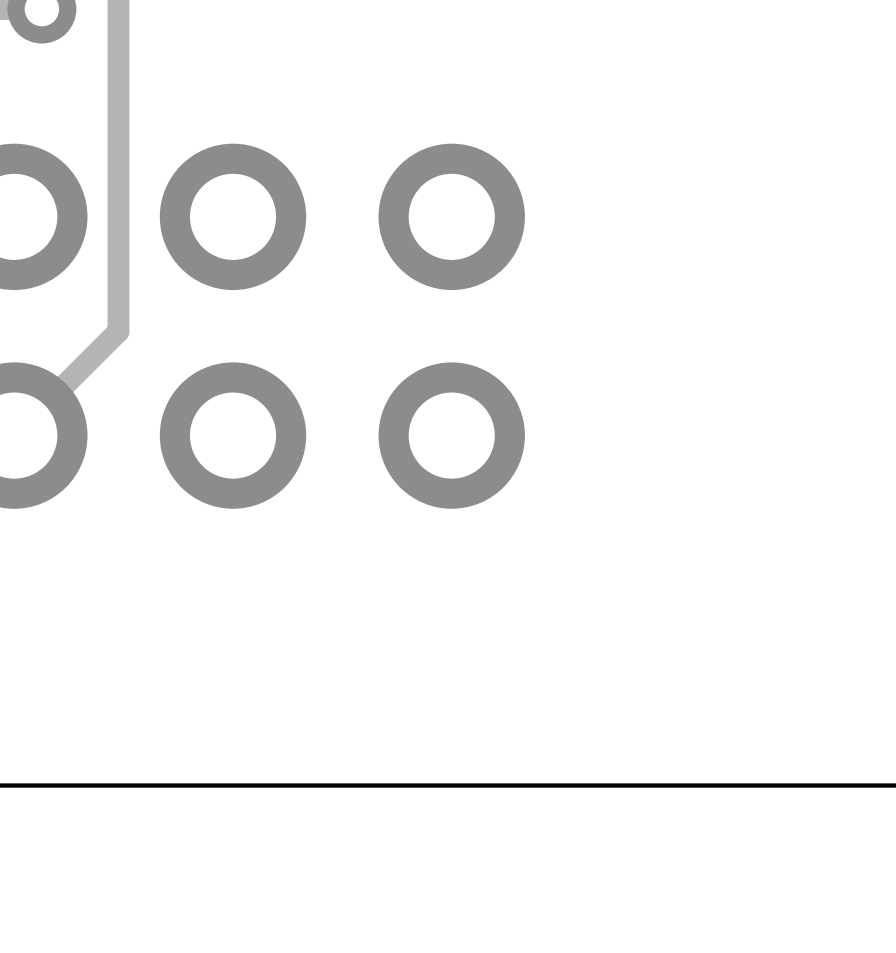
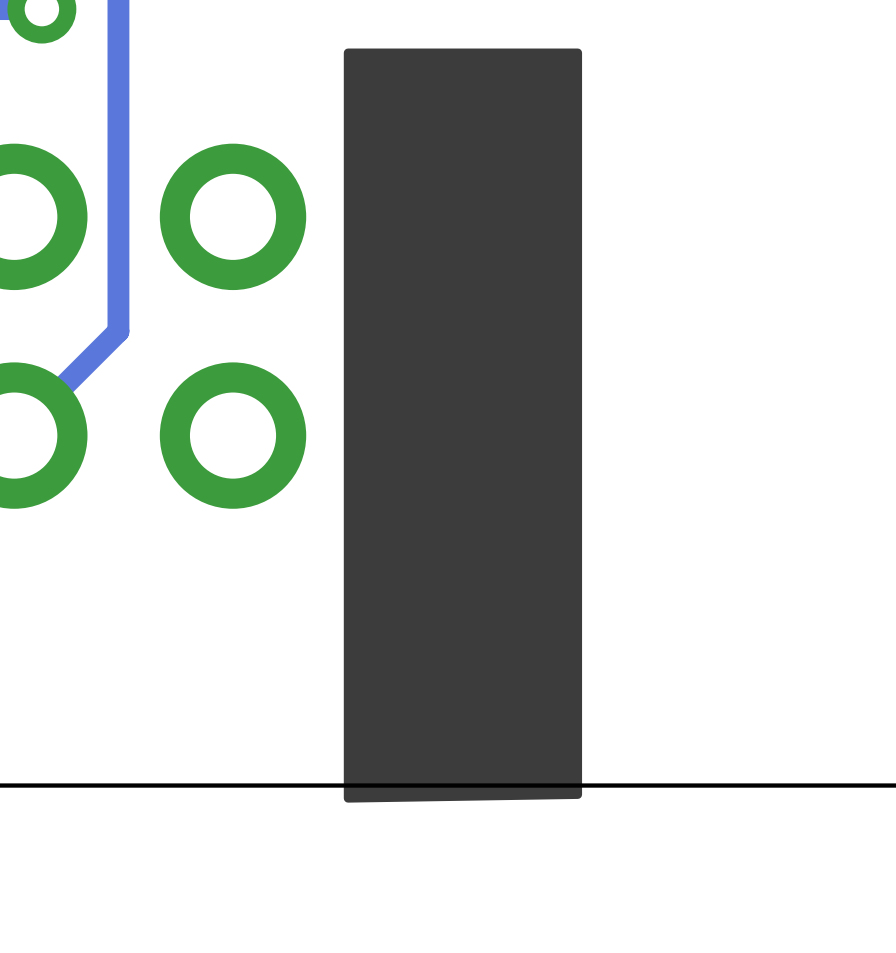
drawing: none -> [343, 48, 583, 803]

